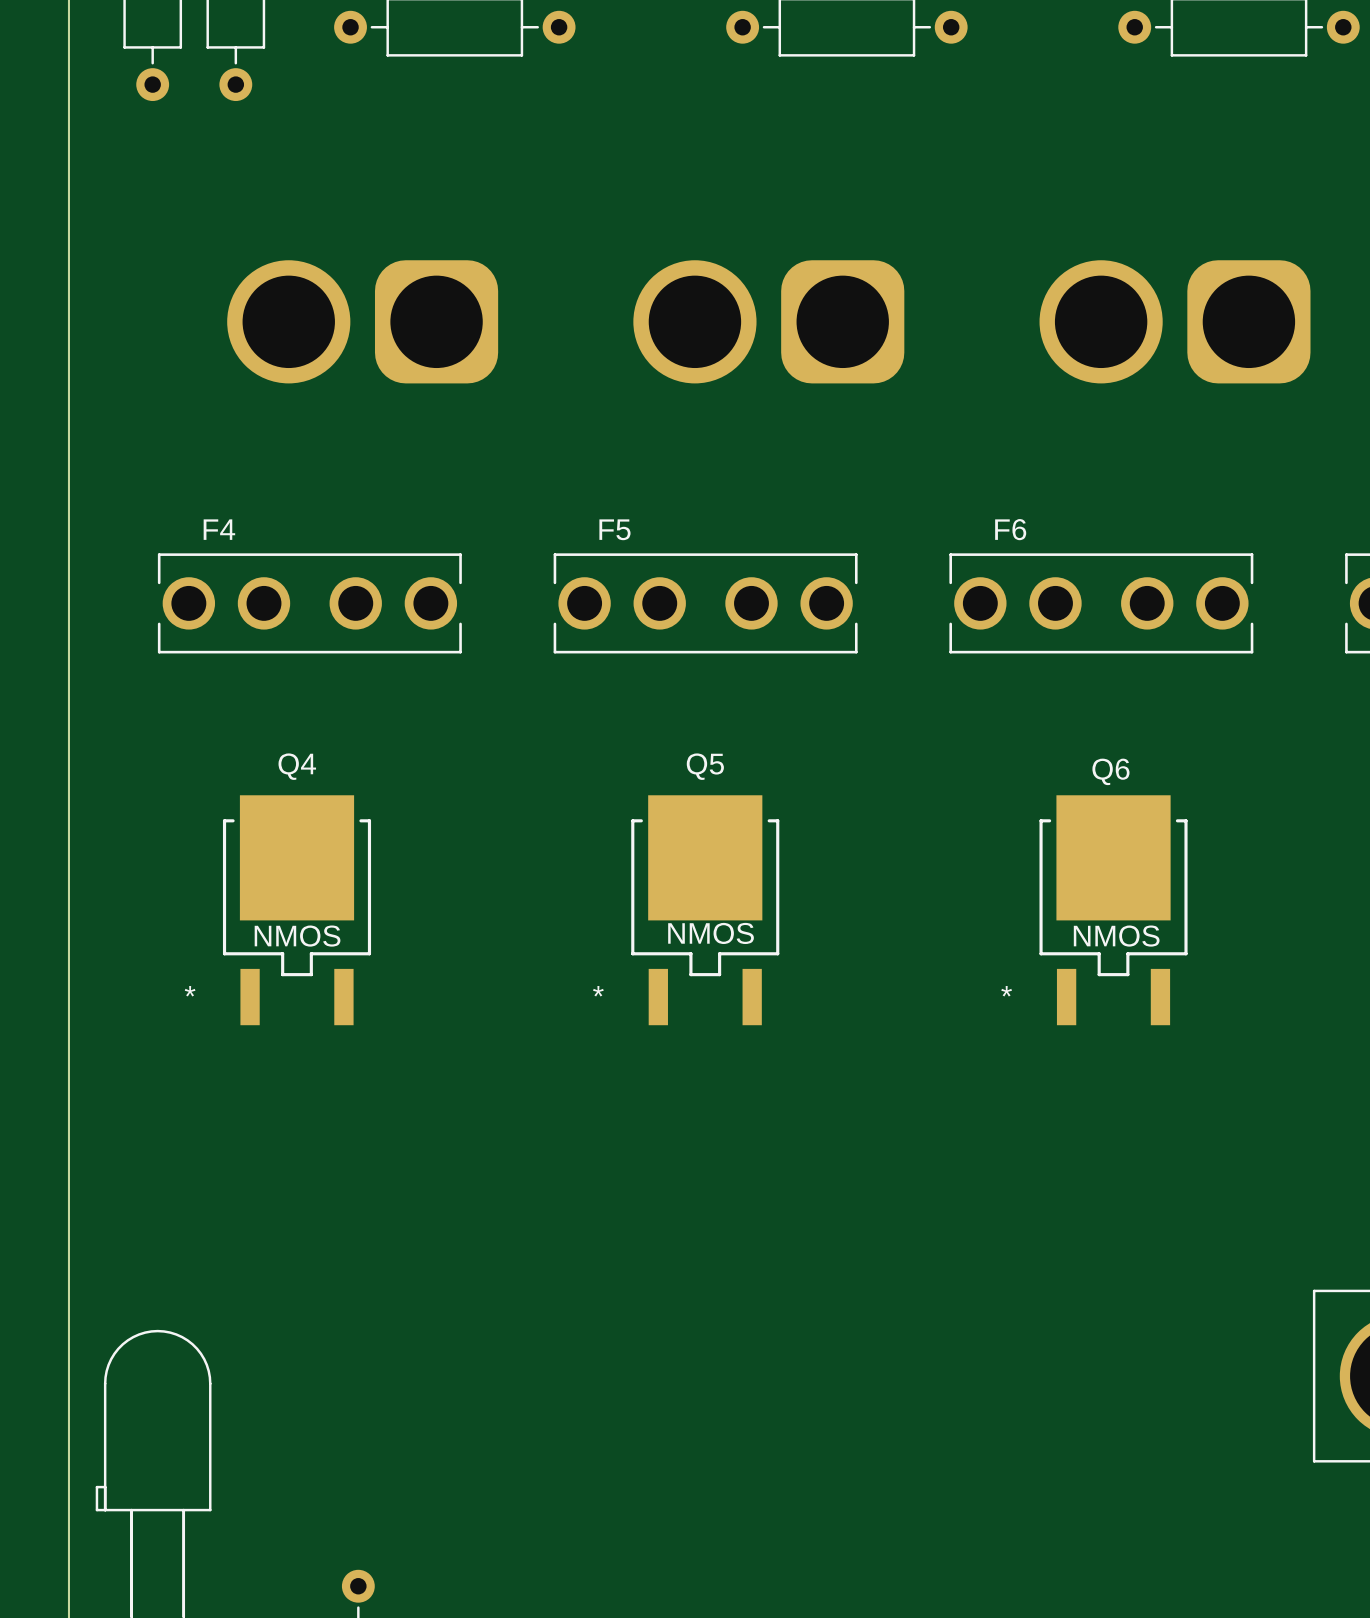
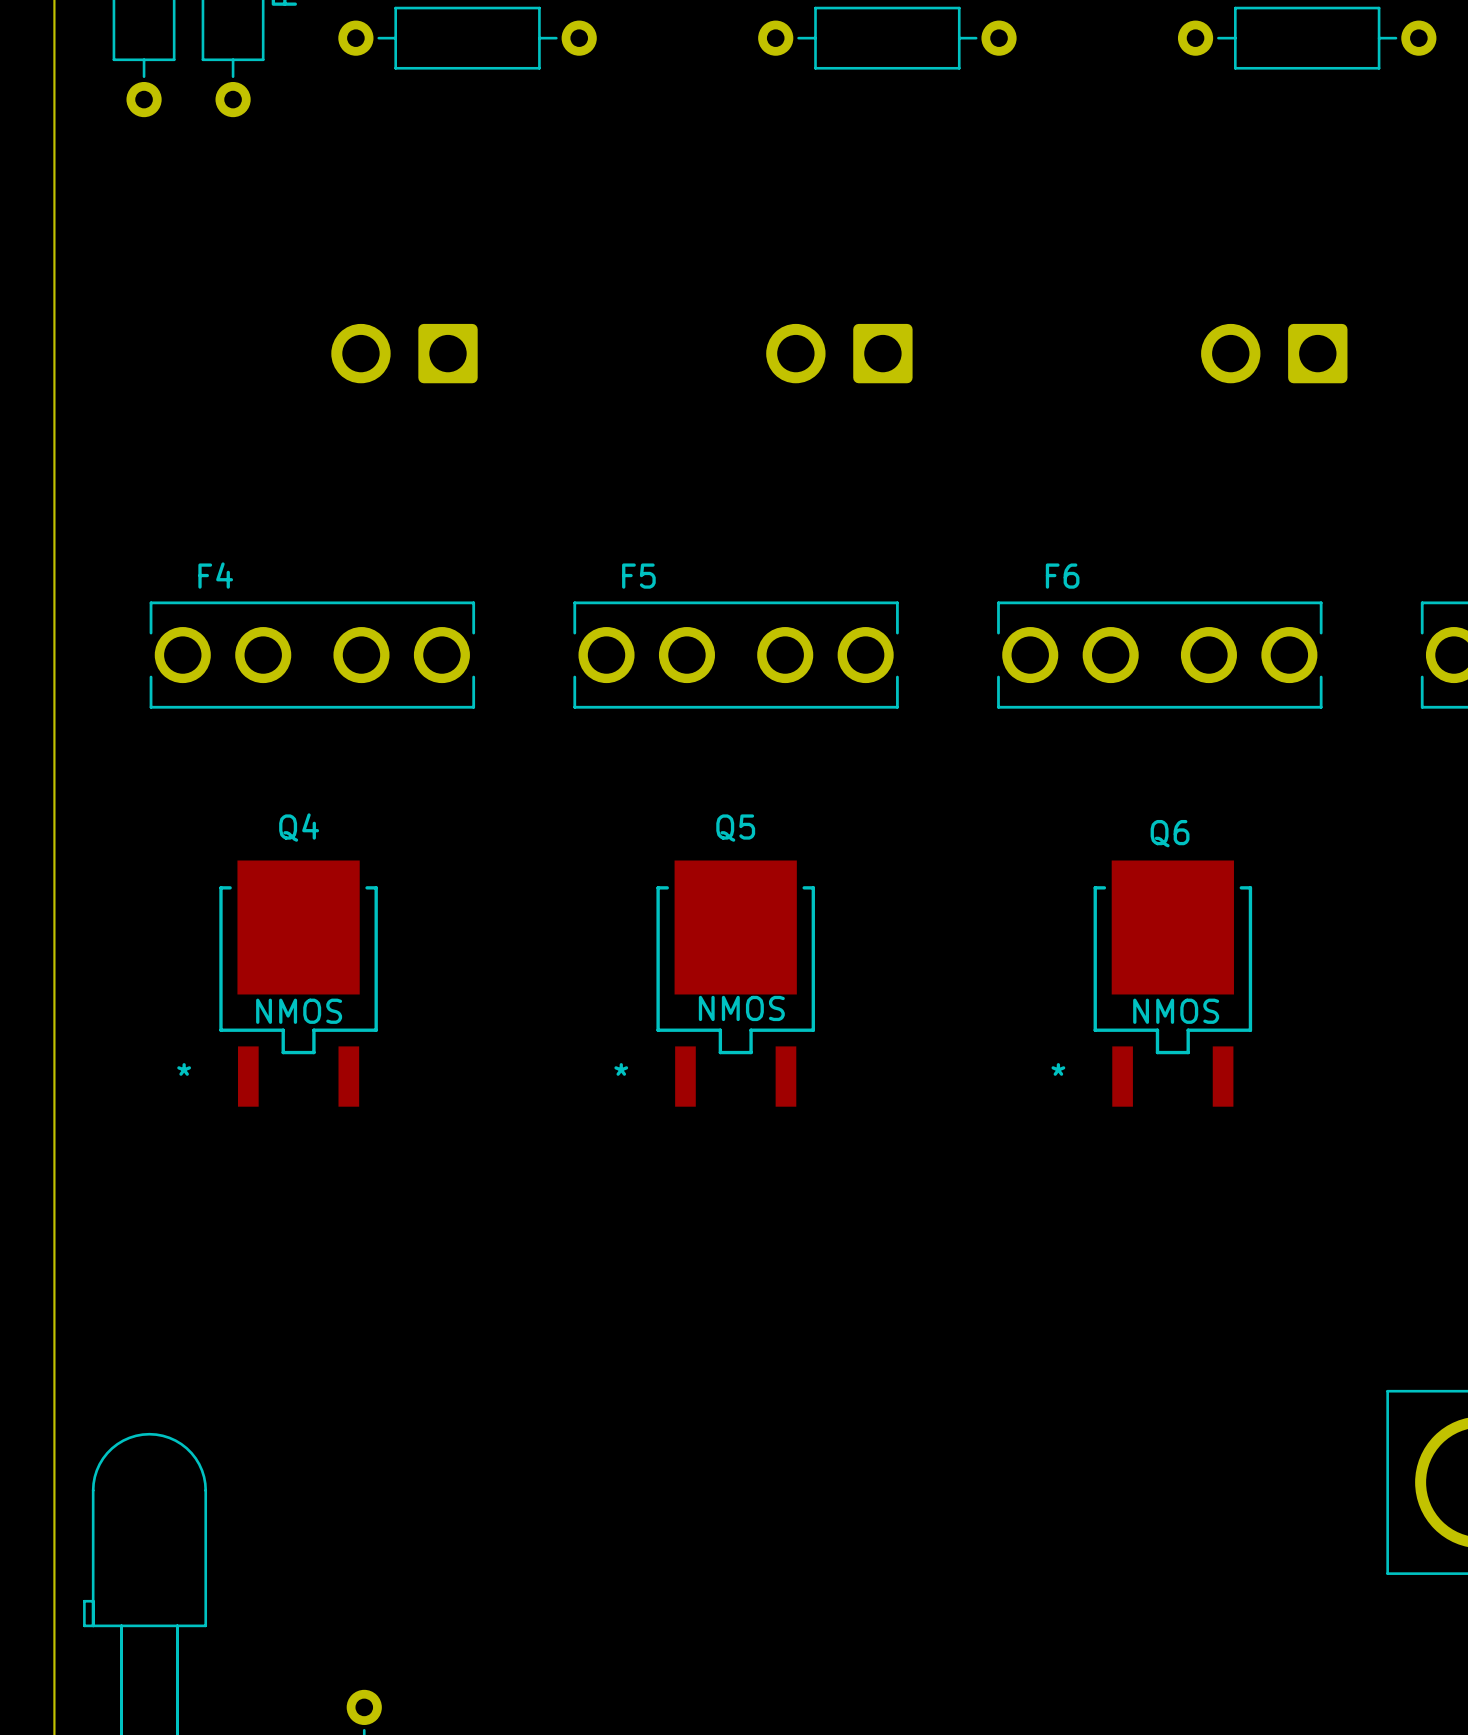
part: (362, 321) -> none
part: none -> (404, 353)
part: (768, 321) -> none
part: none -> (839, 353)
part: (1175, 321) -> none
part: none -> (1274, 353)

